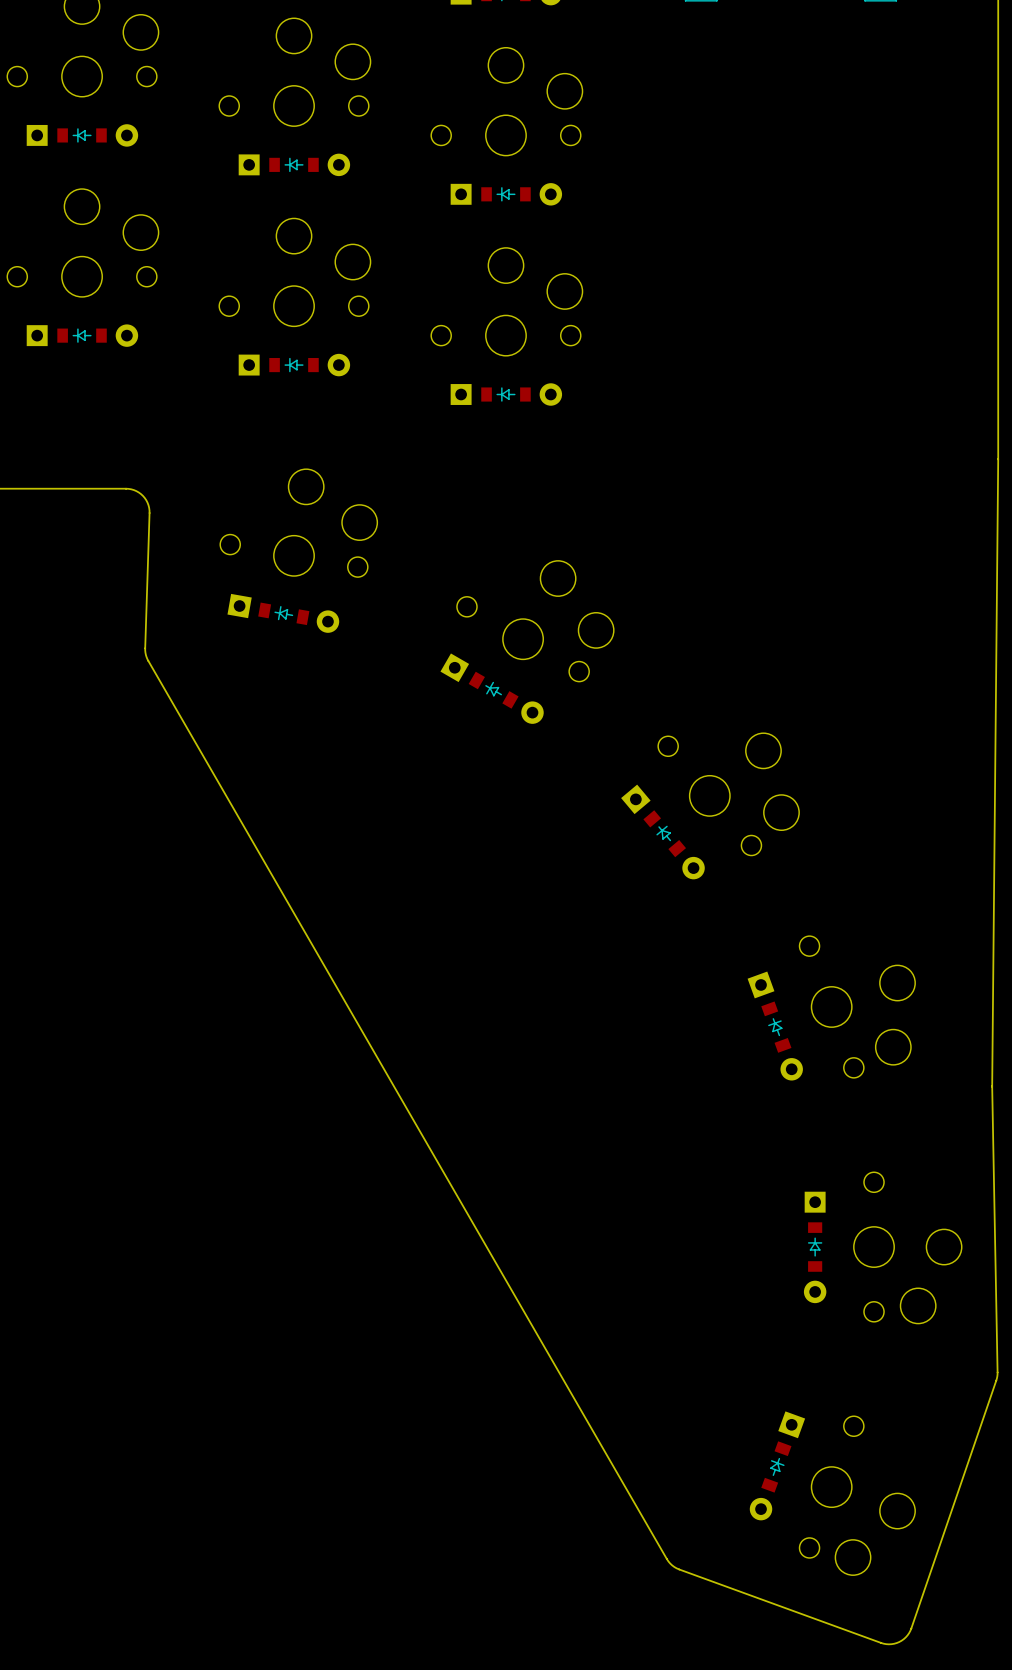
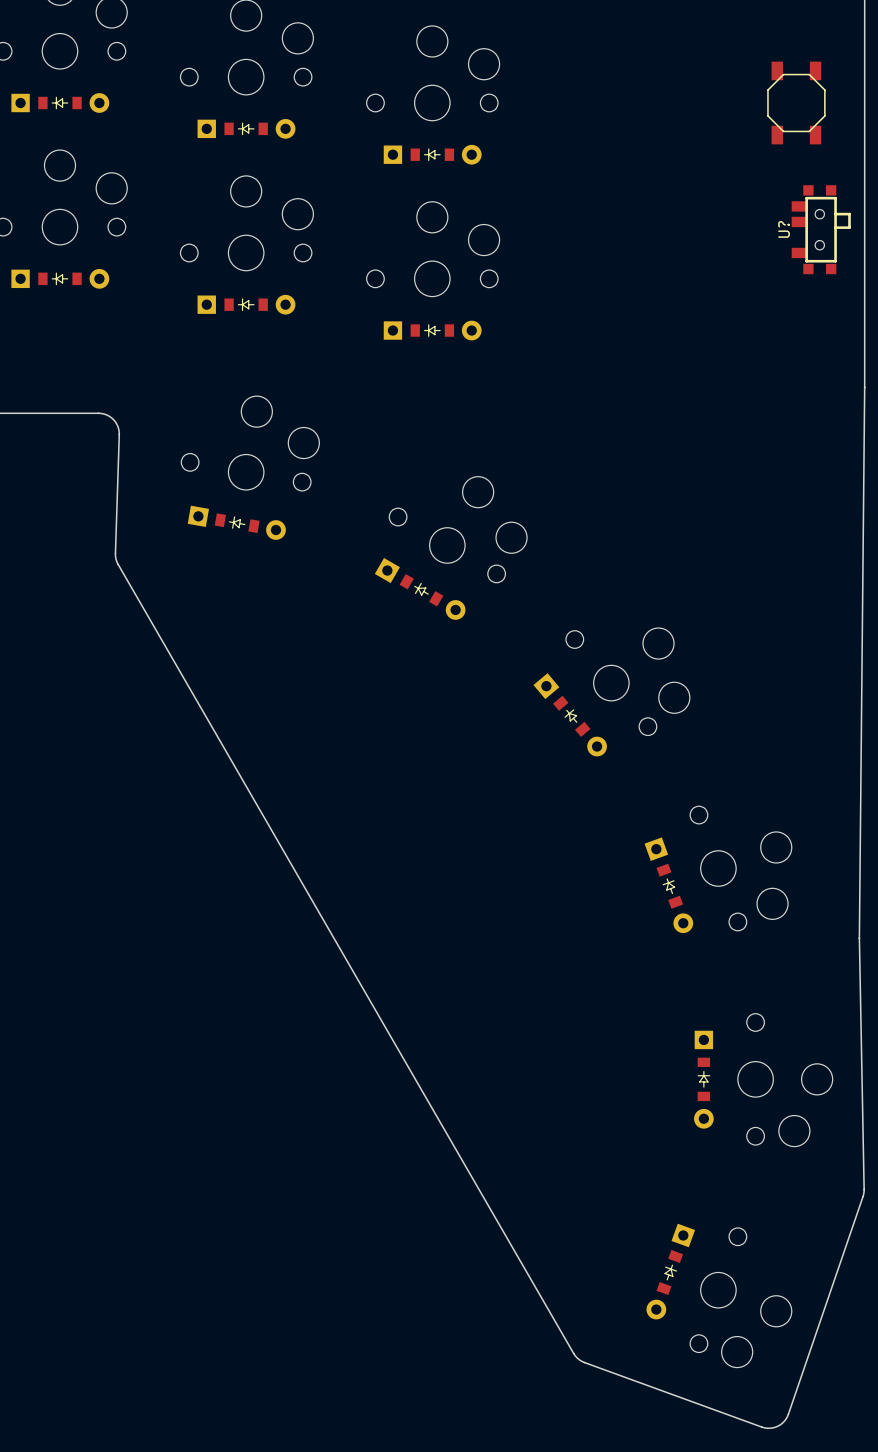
part: none -> (796, 103)
U?: none -> (821, 229)

